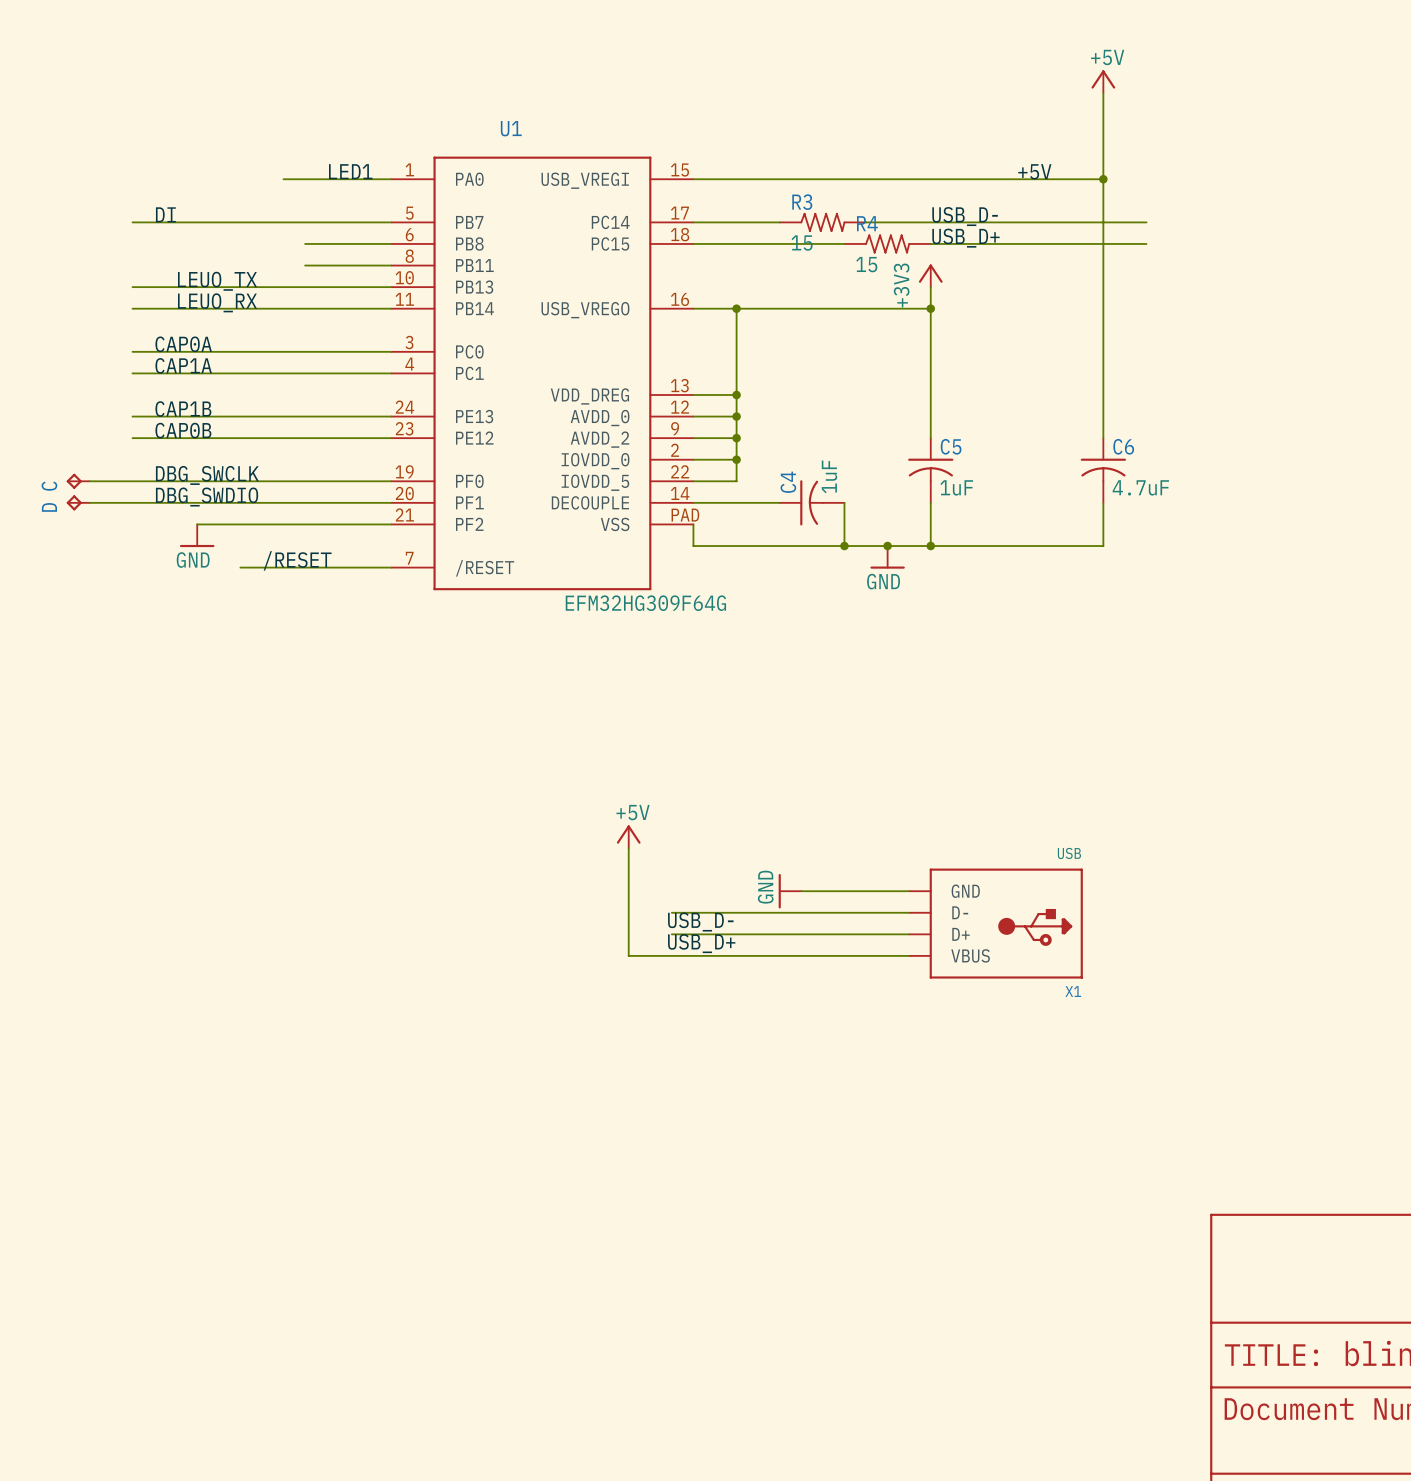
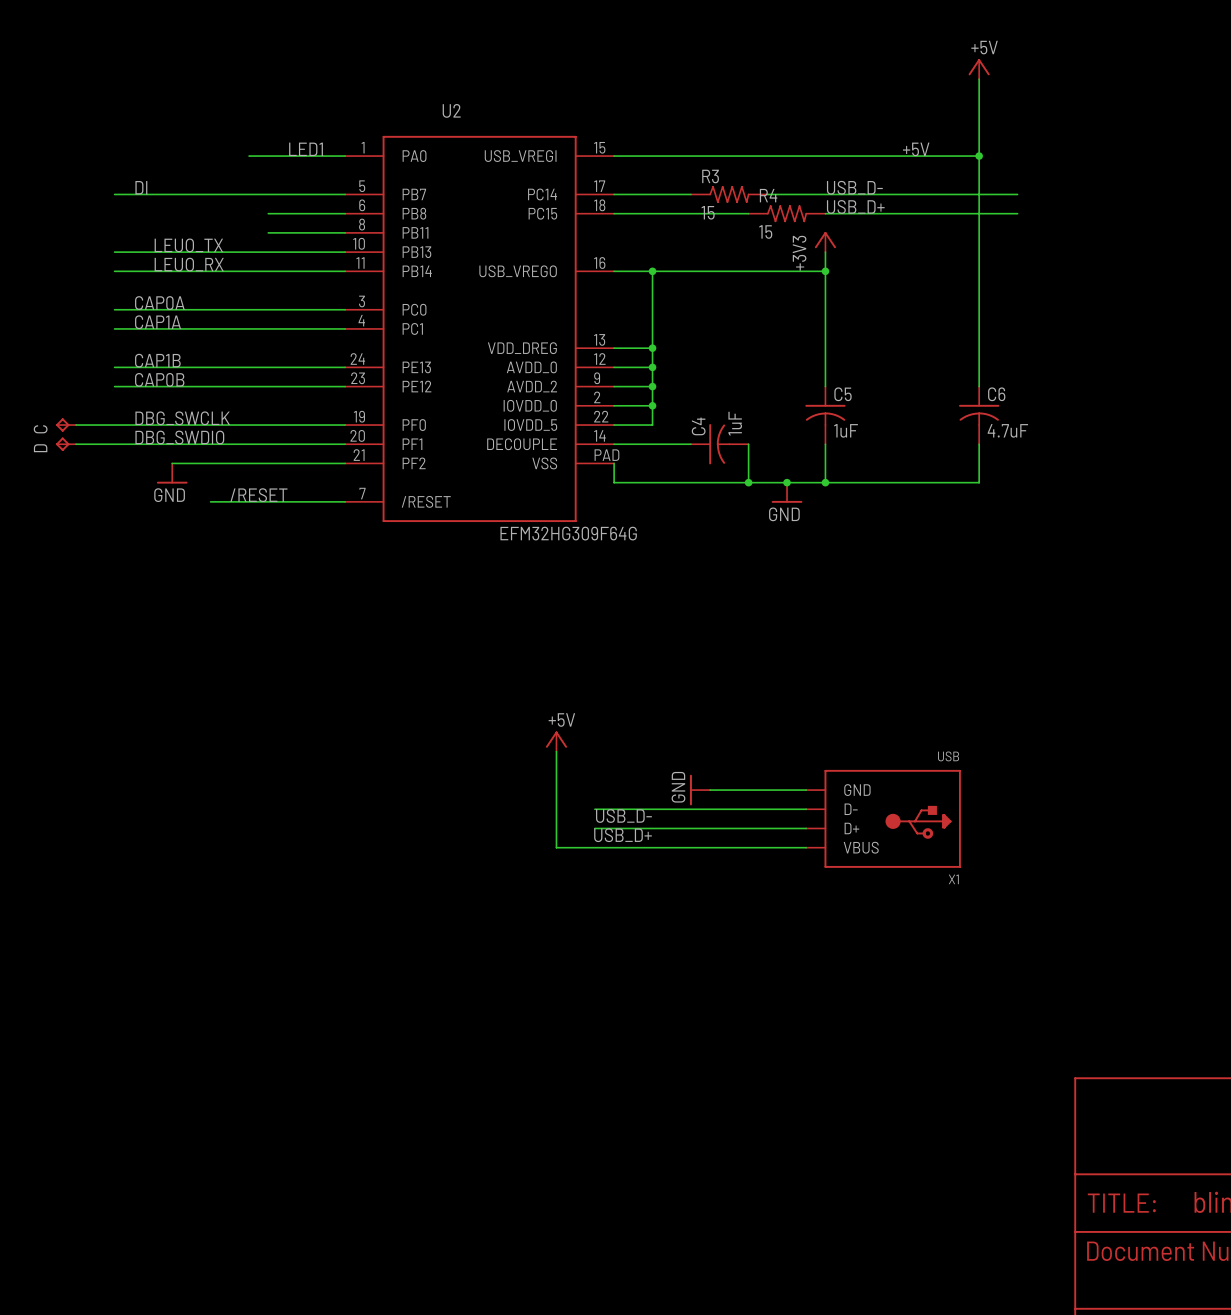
U1 name: U1 (511, 128) -> U2 (451, 110)

